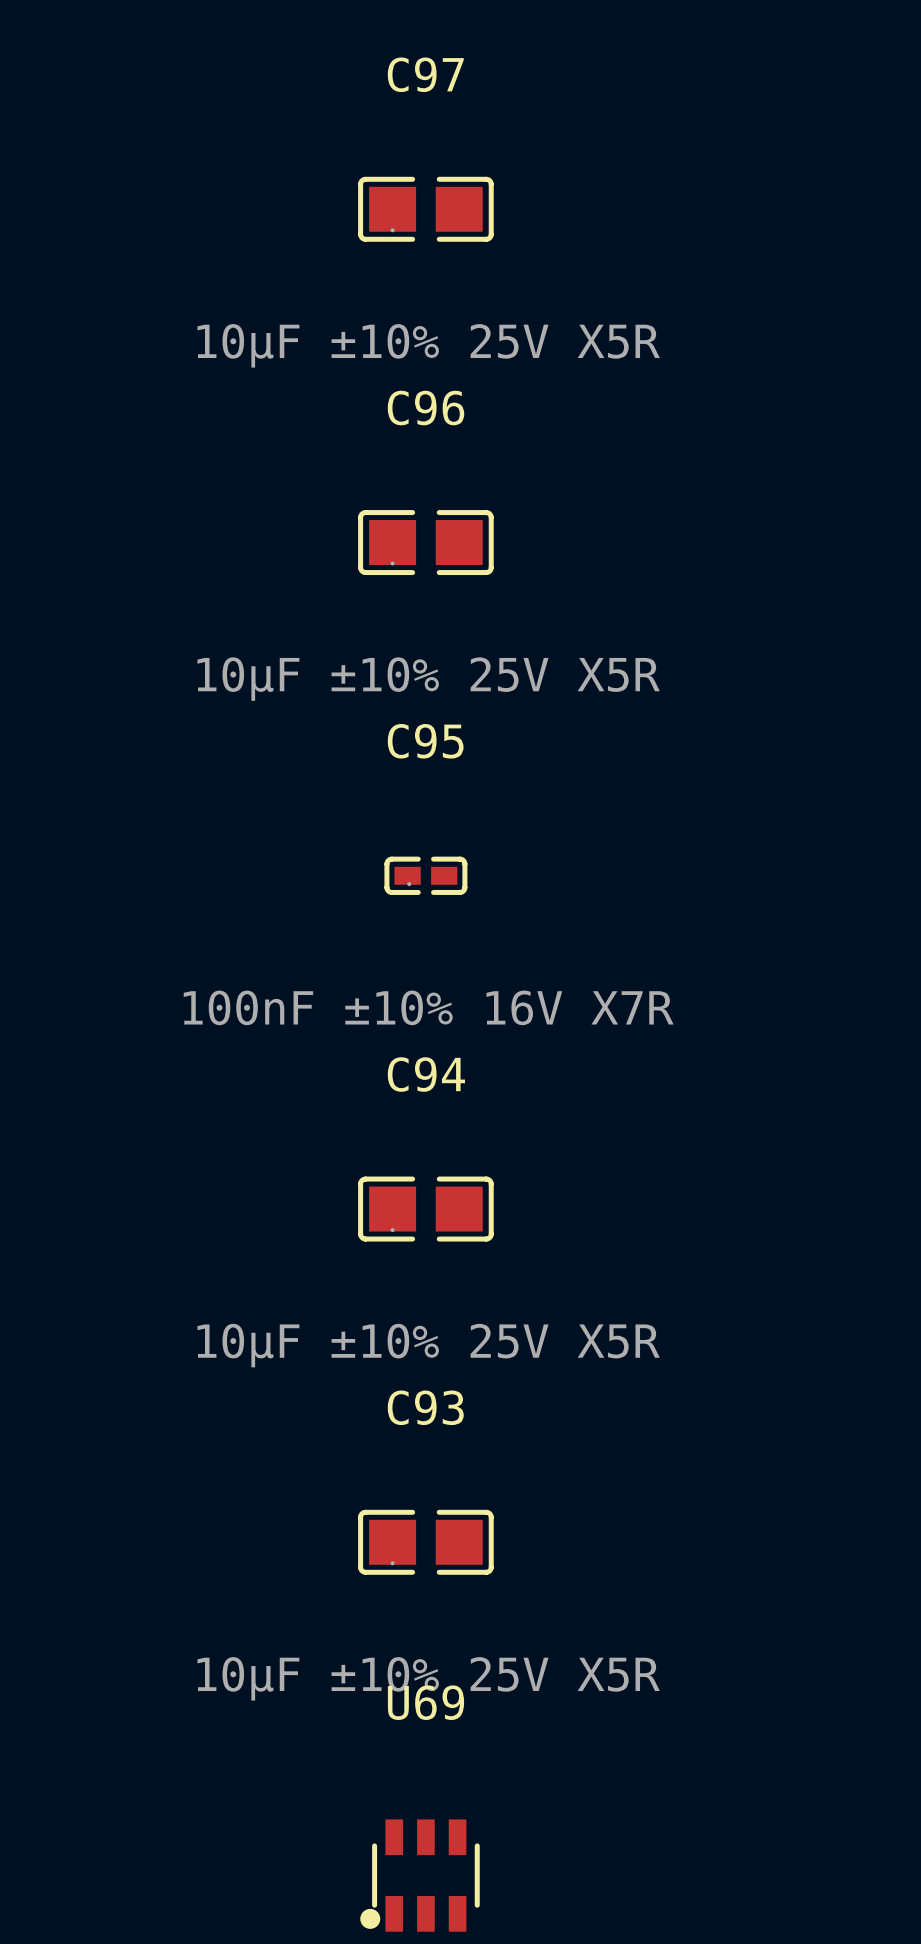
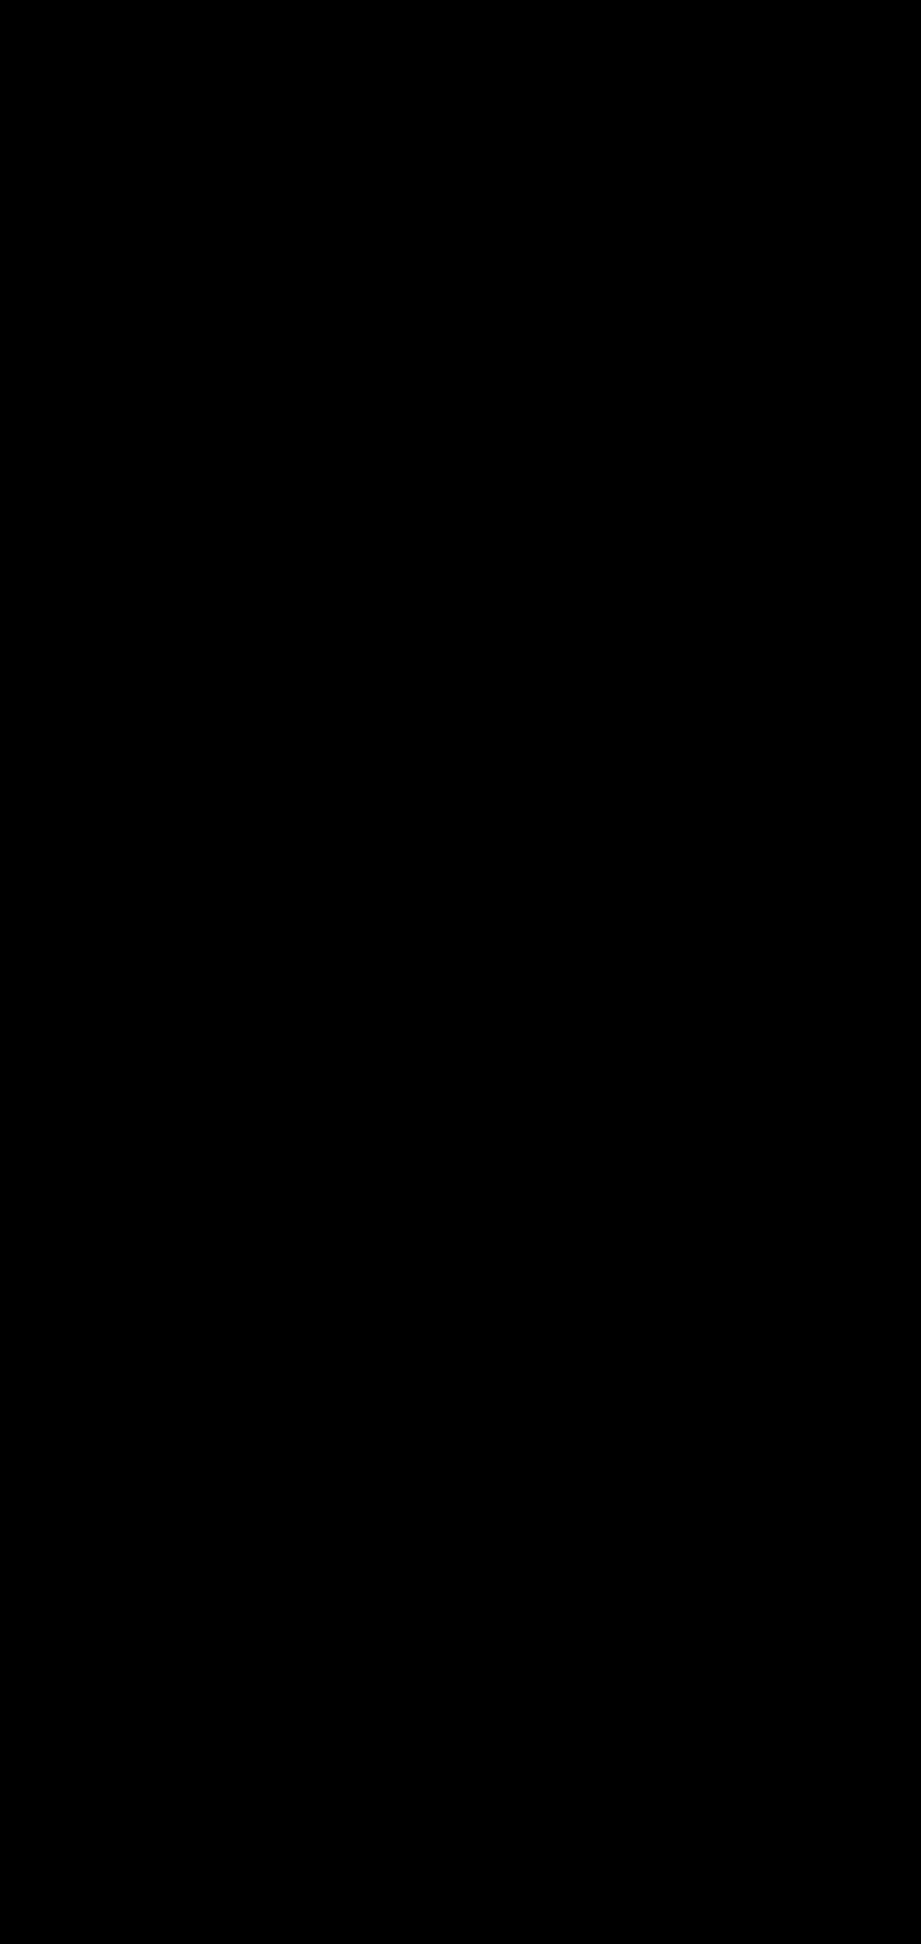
C97: 10µF ±10% 25V X5R (425, 209) -> none
C96: 10µF ±10% 25V X5R (425, 542) -> none
C95: 100nF ±10% 16V X7R (425, 875) -> none
C94: 10µF ±10% 25V X5R (425, 1209) -> none
C93: 10µF ±10% 25V X5R (425, 1542) -> none
U69: (420, 1875) -> none

